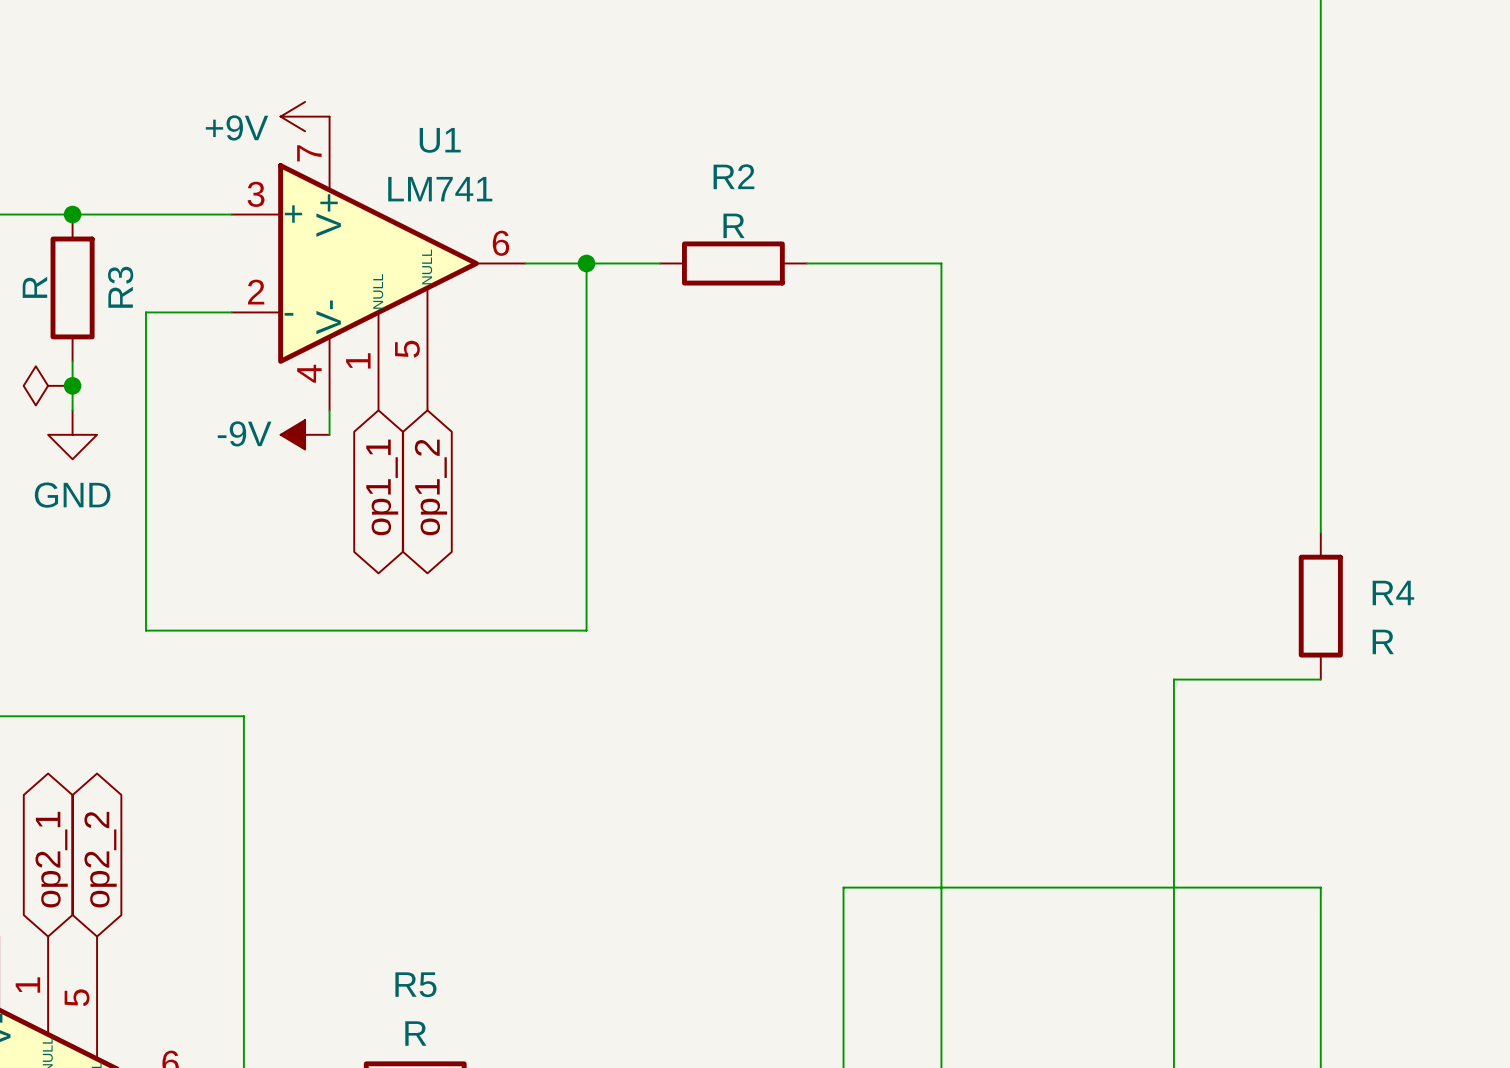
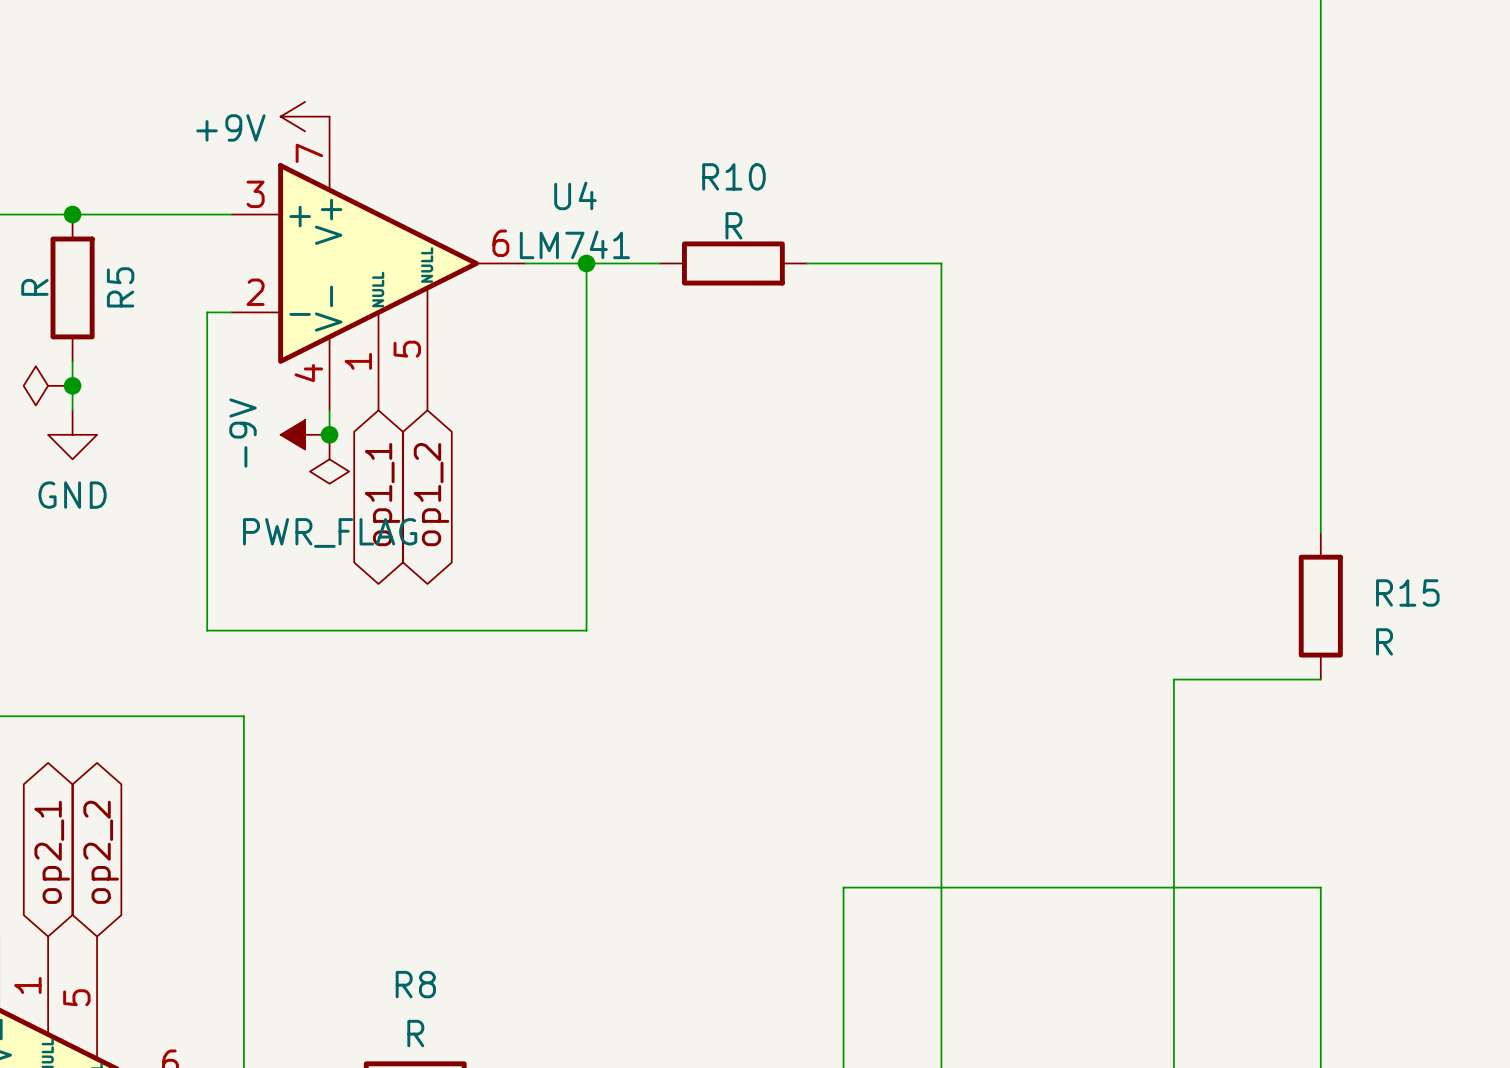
U1 name: U1 (440, 140) -> U4 (575, 195)
R2 name: R2 (733, 176) -> R10 (733, 176)
U1 value position: LM741 (440, 189) -> LM741 (574, 244)
R3 name: R3 (120, 287) -> R5 (120, 287)
wire: (207, 312) (146, 312) (146, 630) (207, 630) -> (207, 312) (207, 630)
power symbol text rotation: 0° (244, 433) -> 90° counterclockwise (242, 433)
junction: none -> (329, 434)
power symbol: none -> PWR_FLAG (329, 459)
R4 name: R4 (1393, 592) -> R15 (1407, 592)
R5 name: R5 (415, 984) -> R8 (415, 984)

